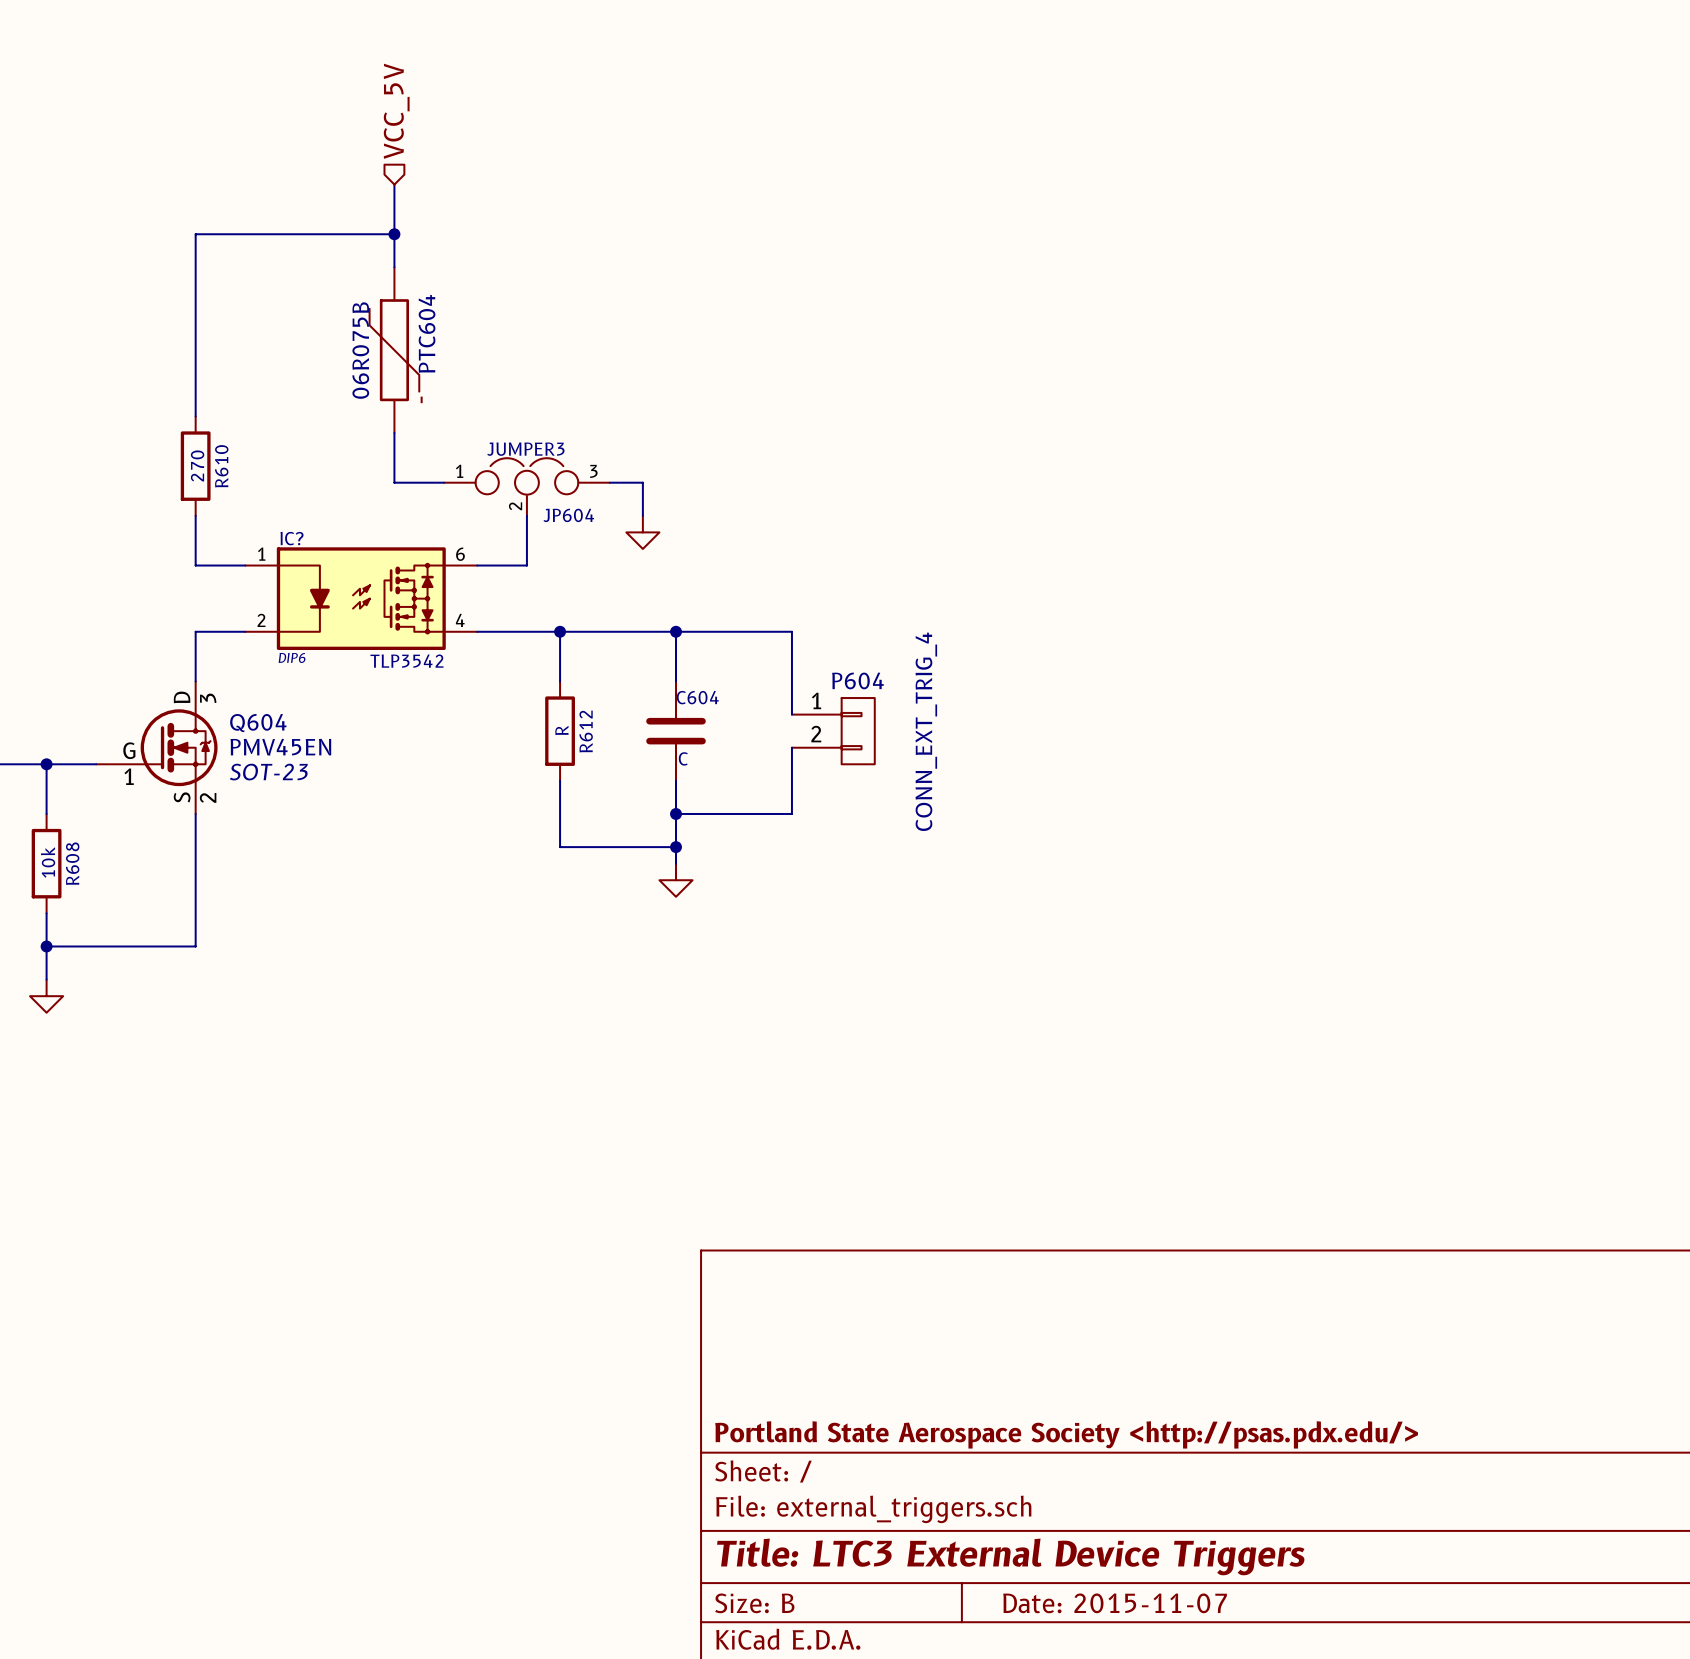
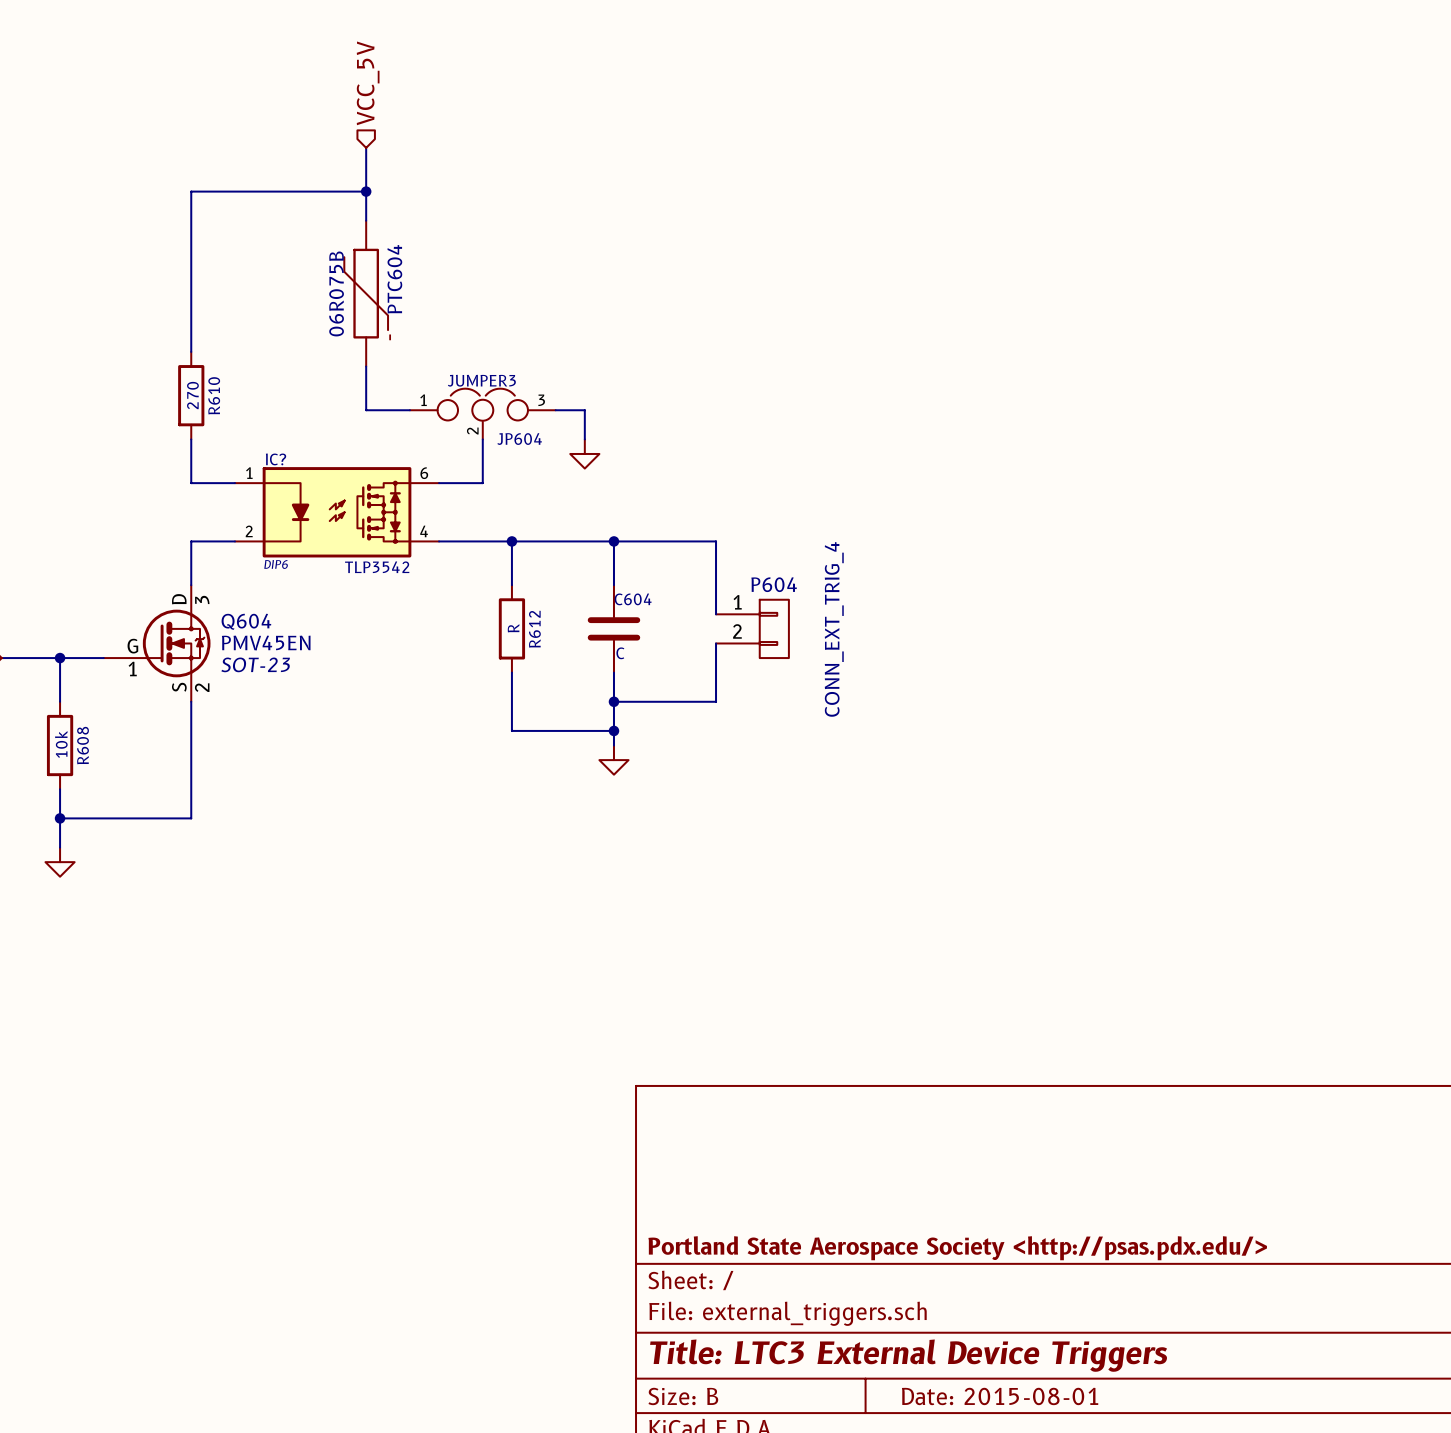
title block: Date: 2015-11-07 (1115, 1603) -> Date: 2015-08-01 (1000, 1396)

